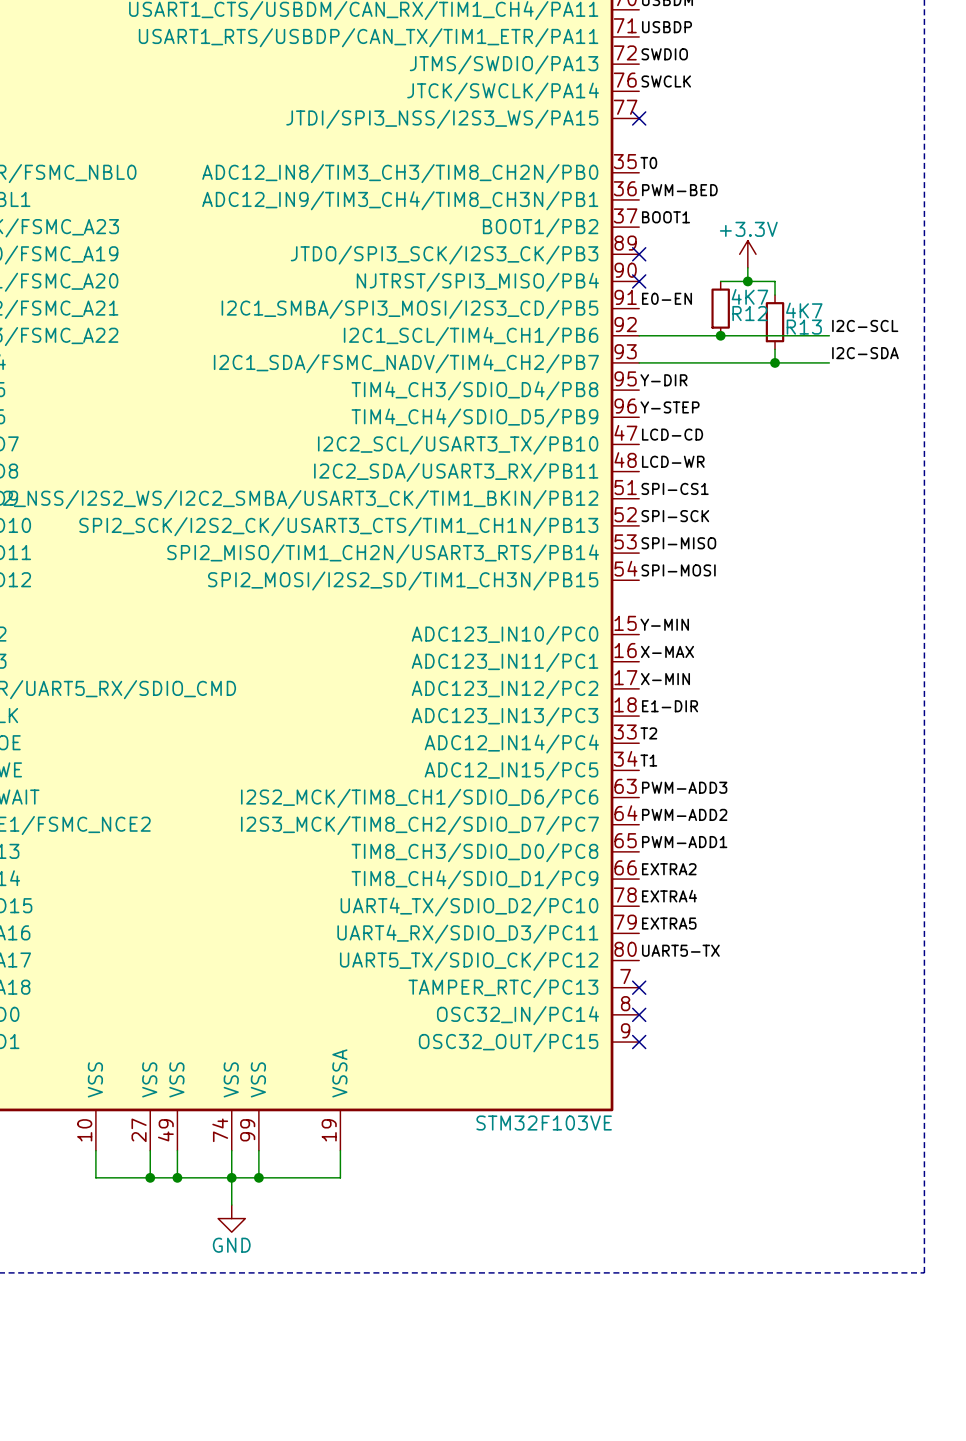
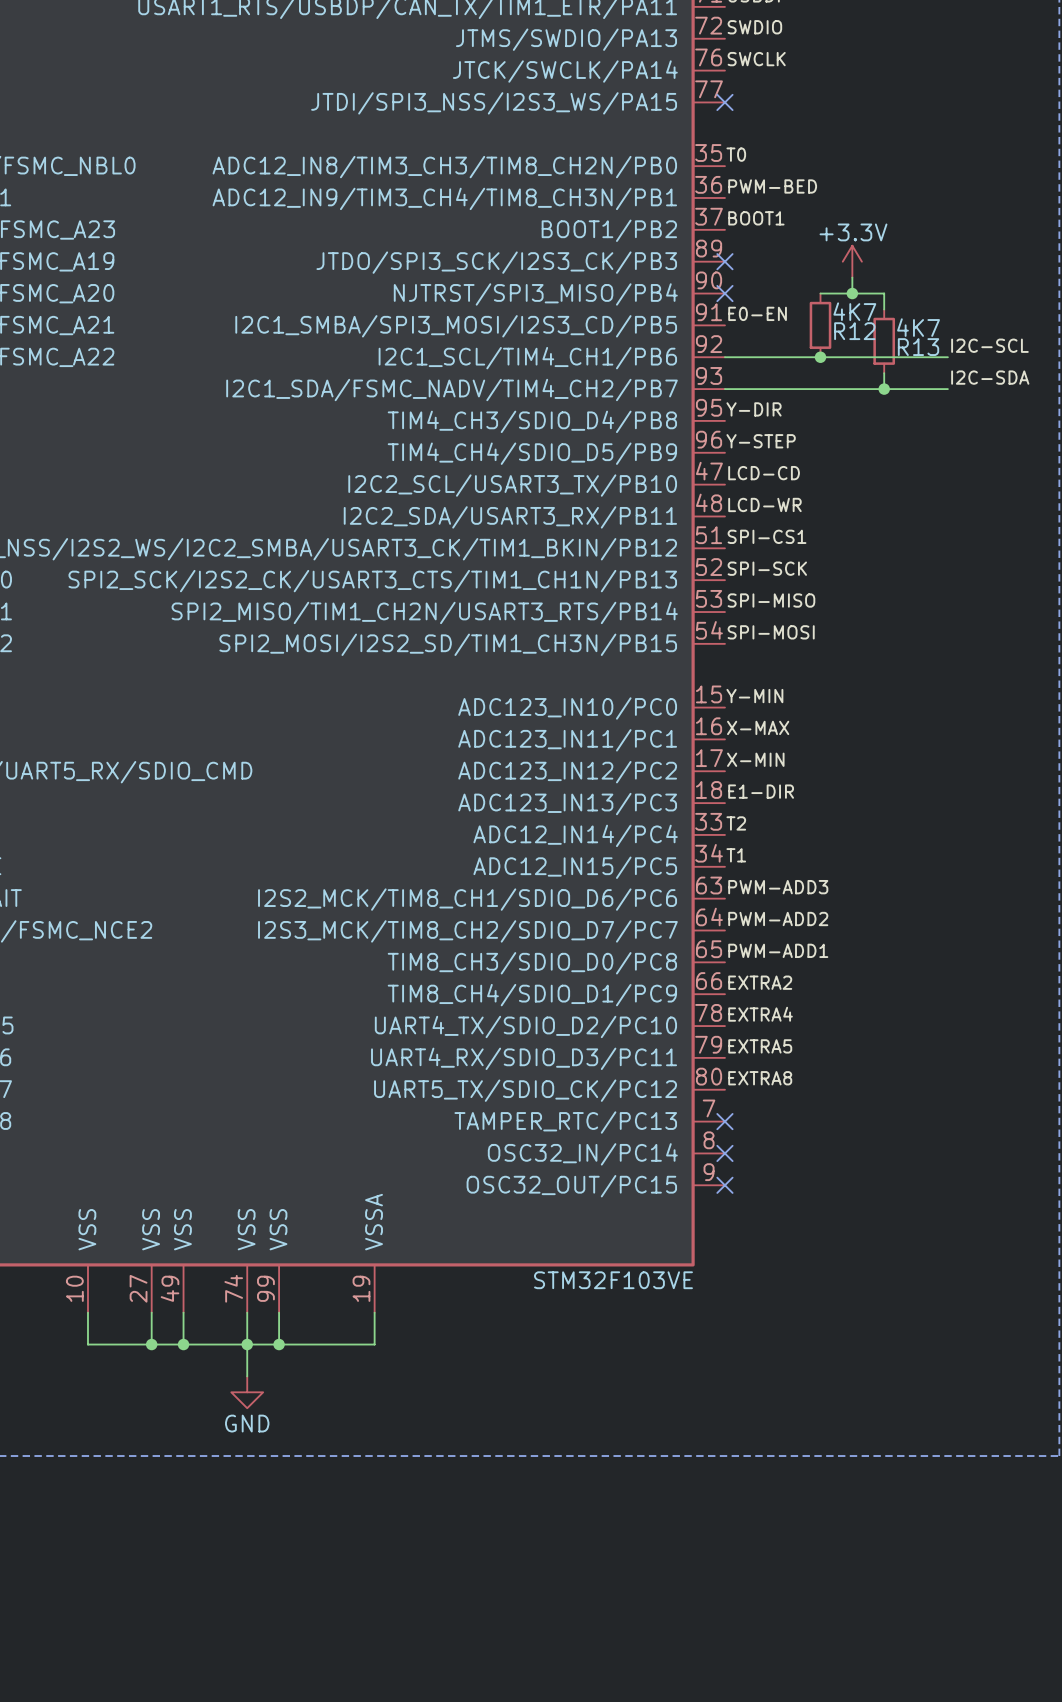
label: UART5-TX (680, 950) -> EXTRA8 (760, 1078)

